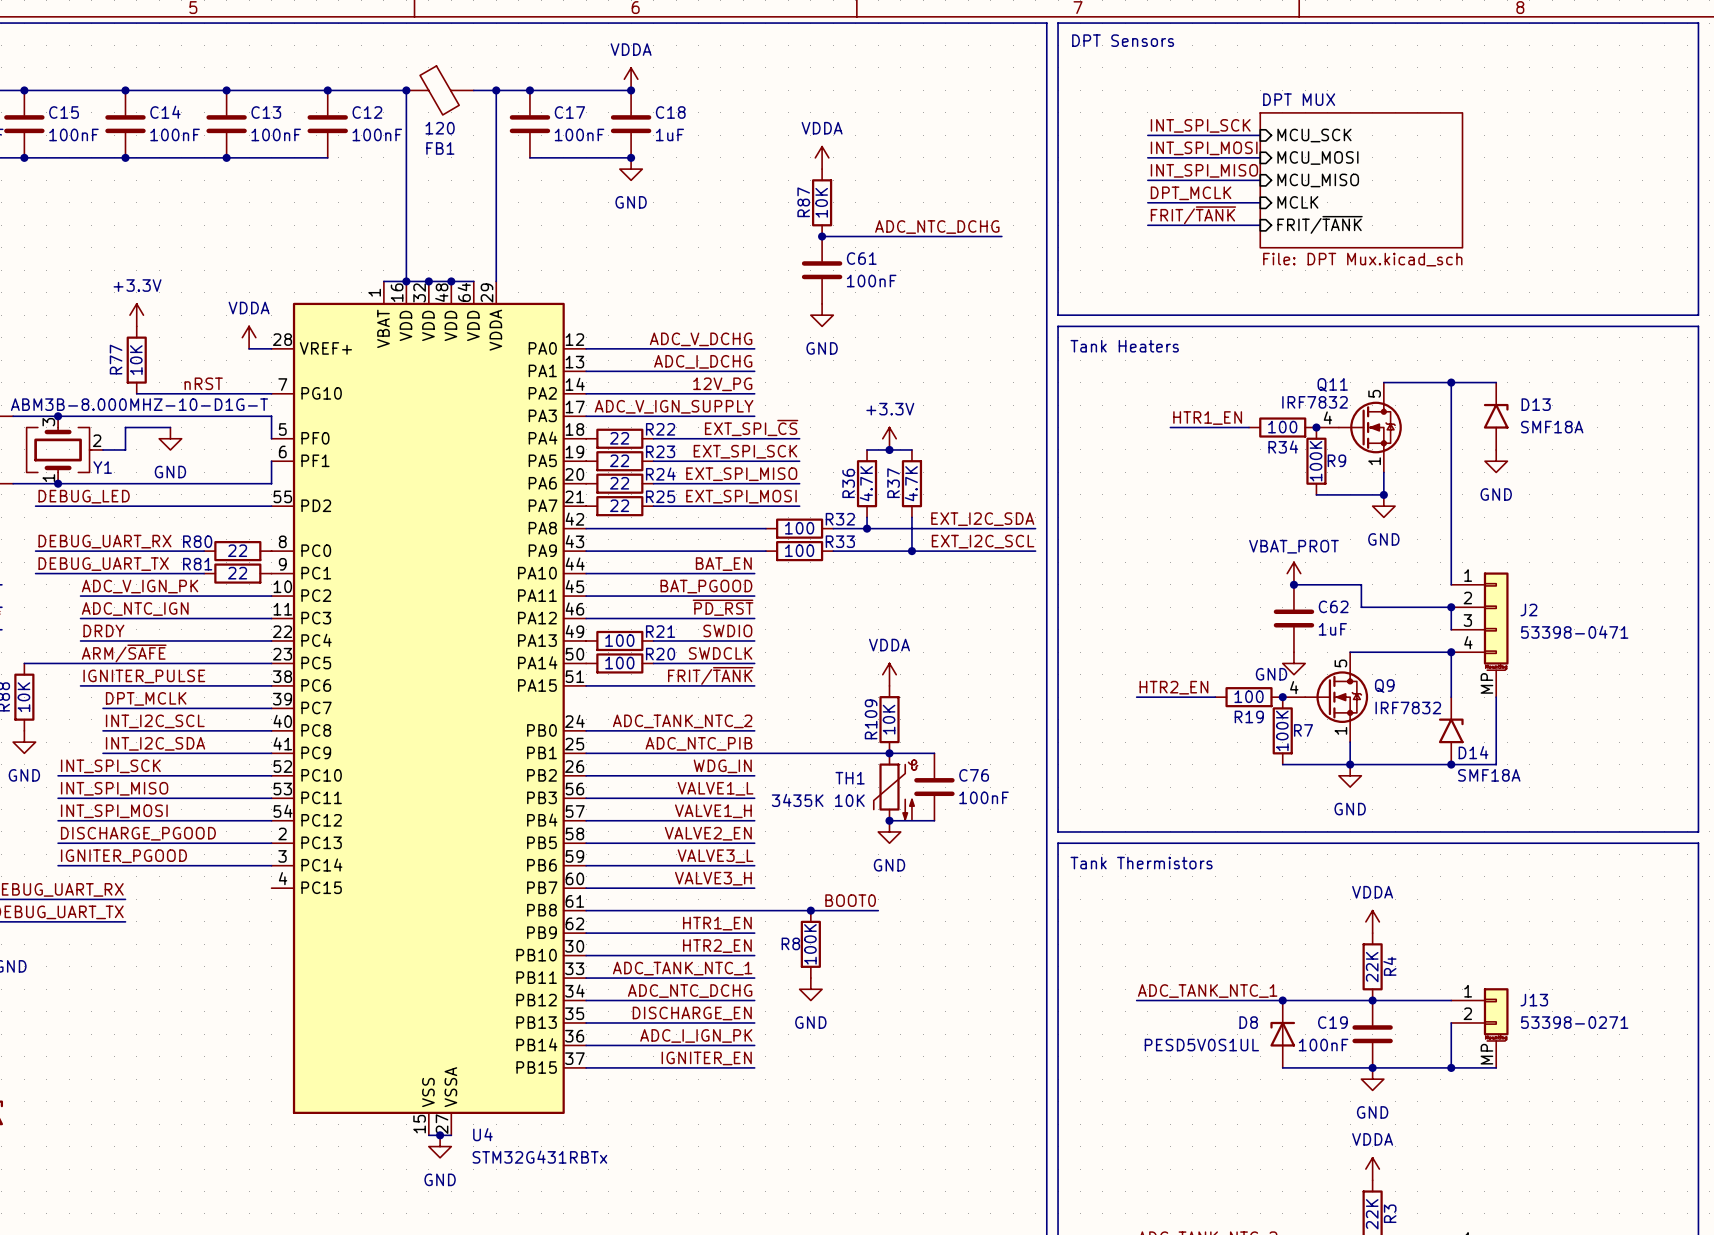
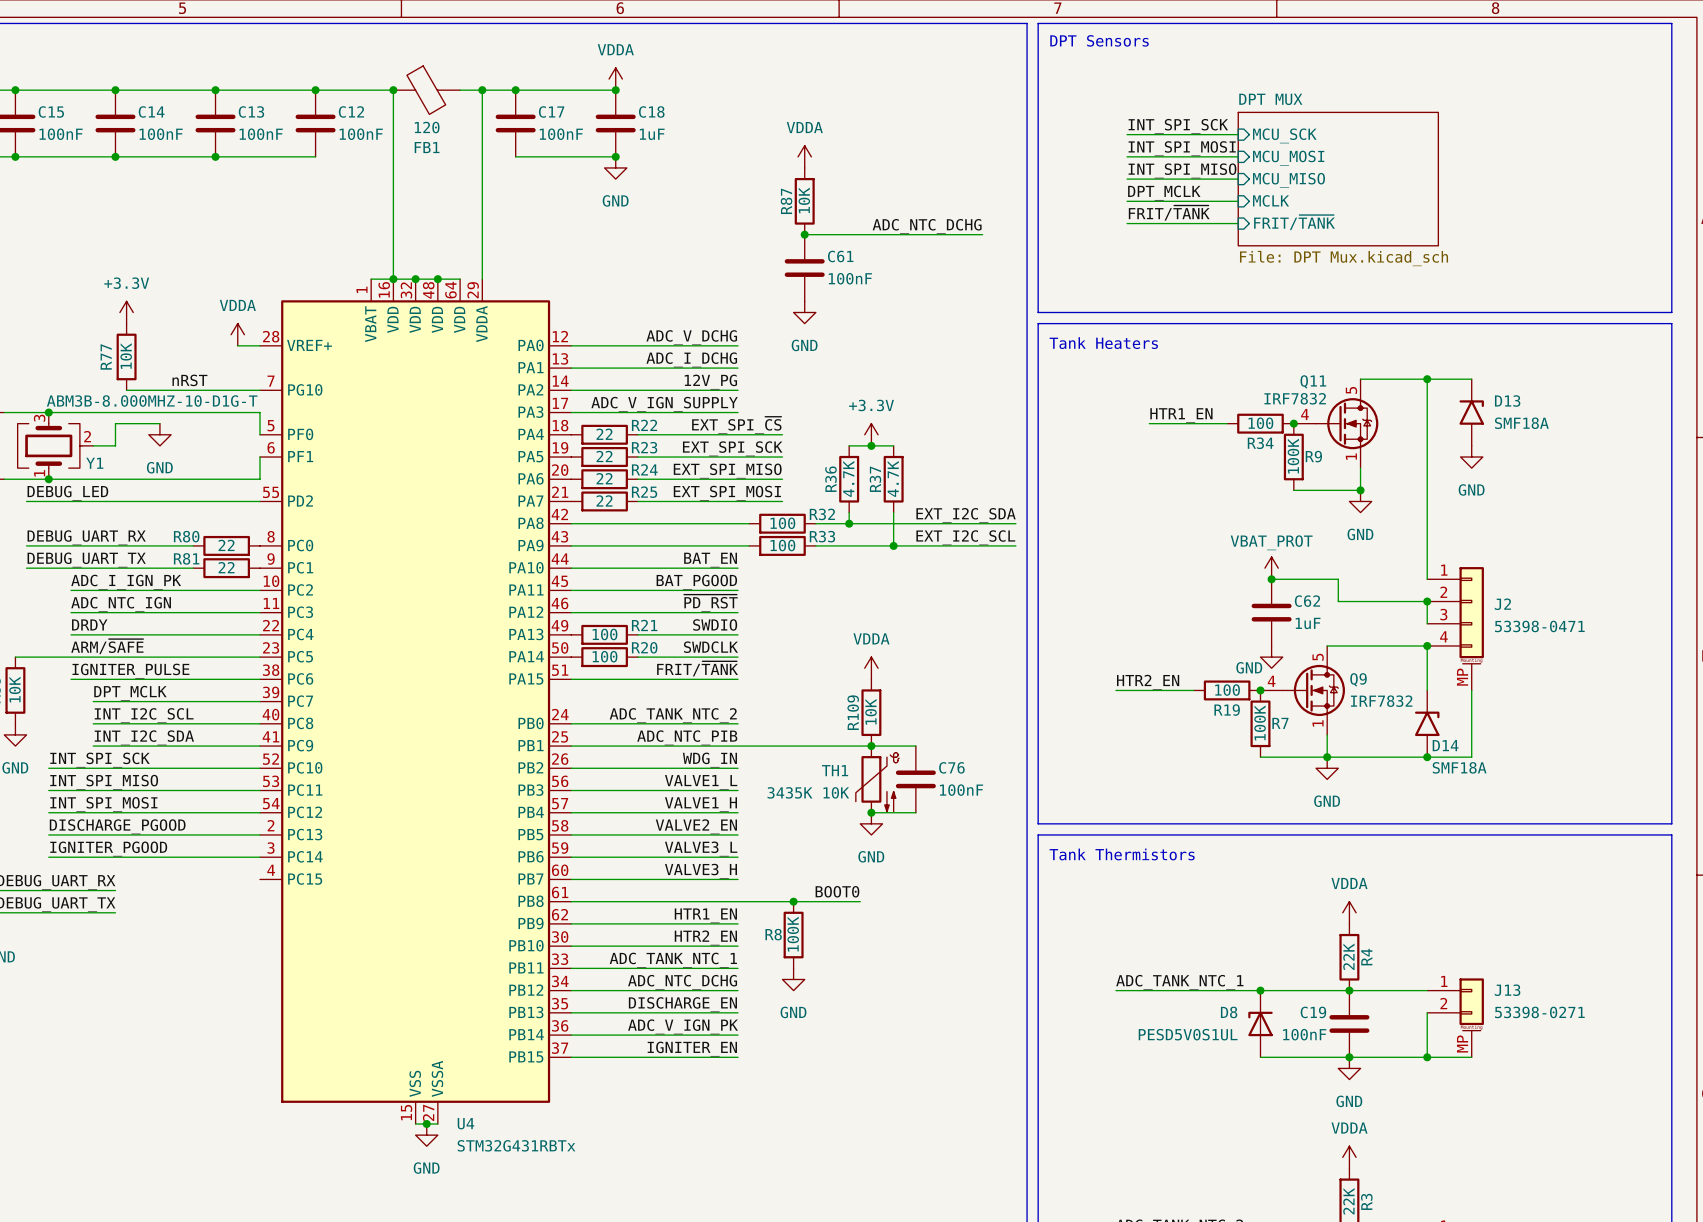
label: ADC_V_IGN_PK (140, 586) -> ADC_I_IGN_PK (126, 582)
label: ADC_I_IGN_PK (696, 1035) -> ADC_V_IGN_PK (683, 1026)

